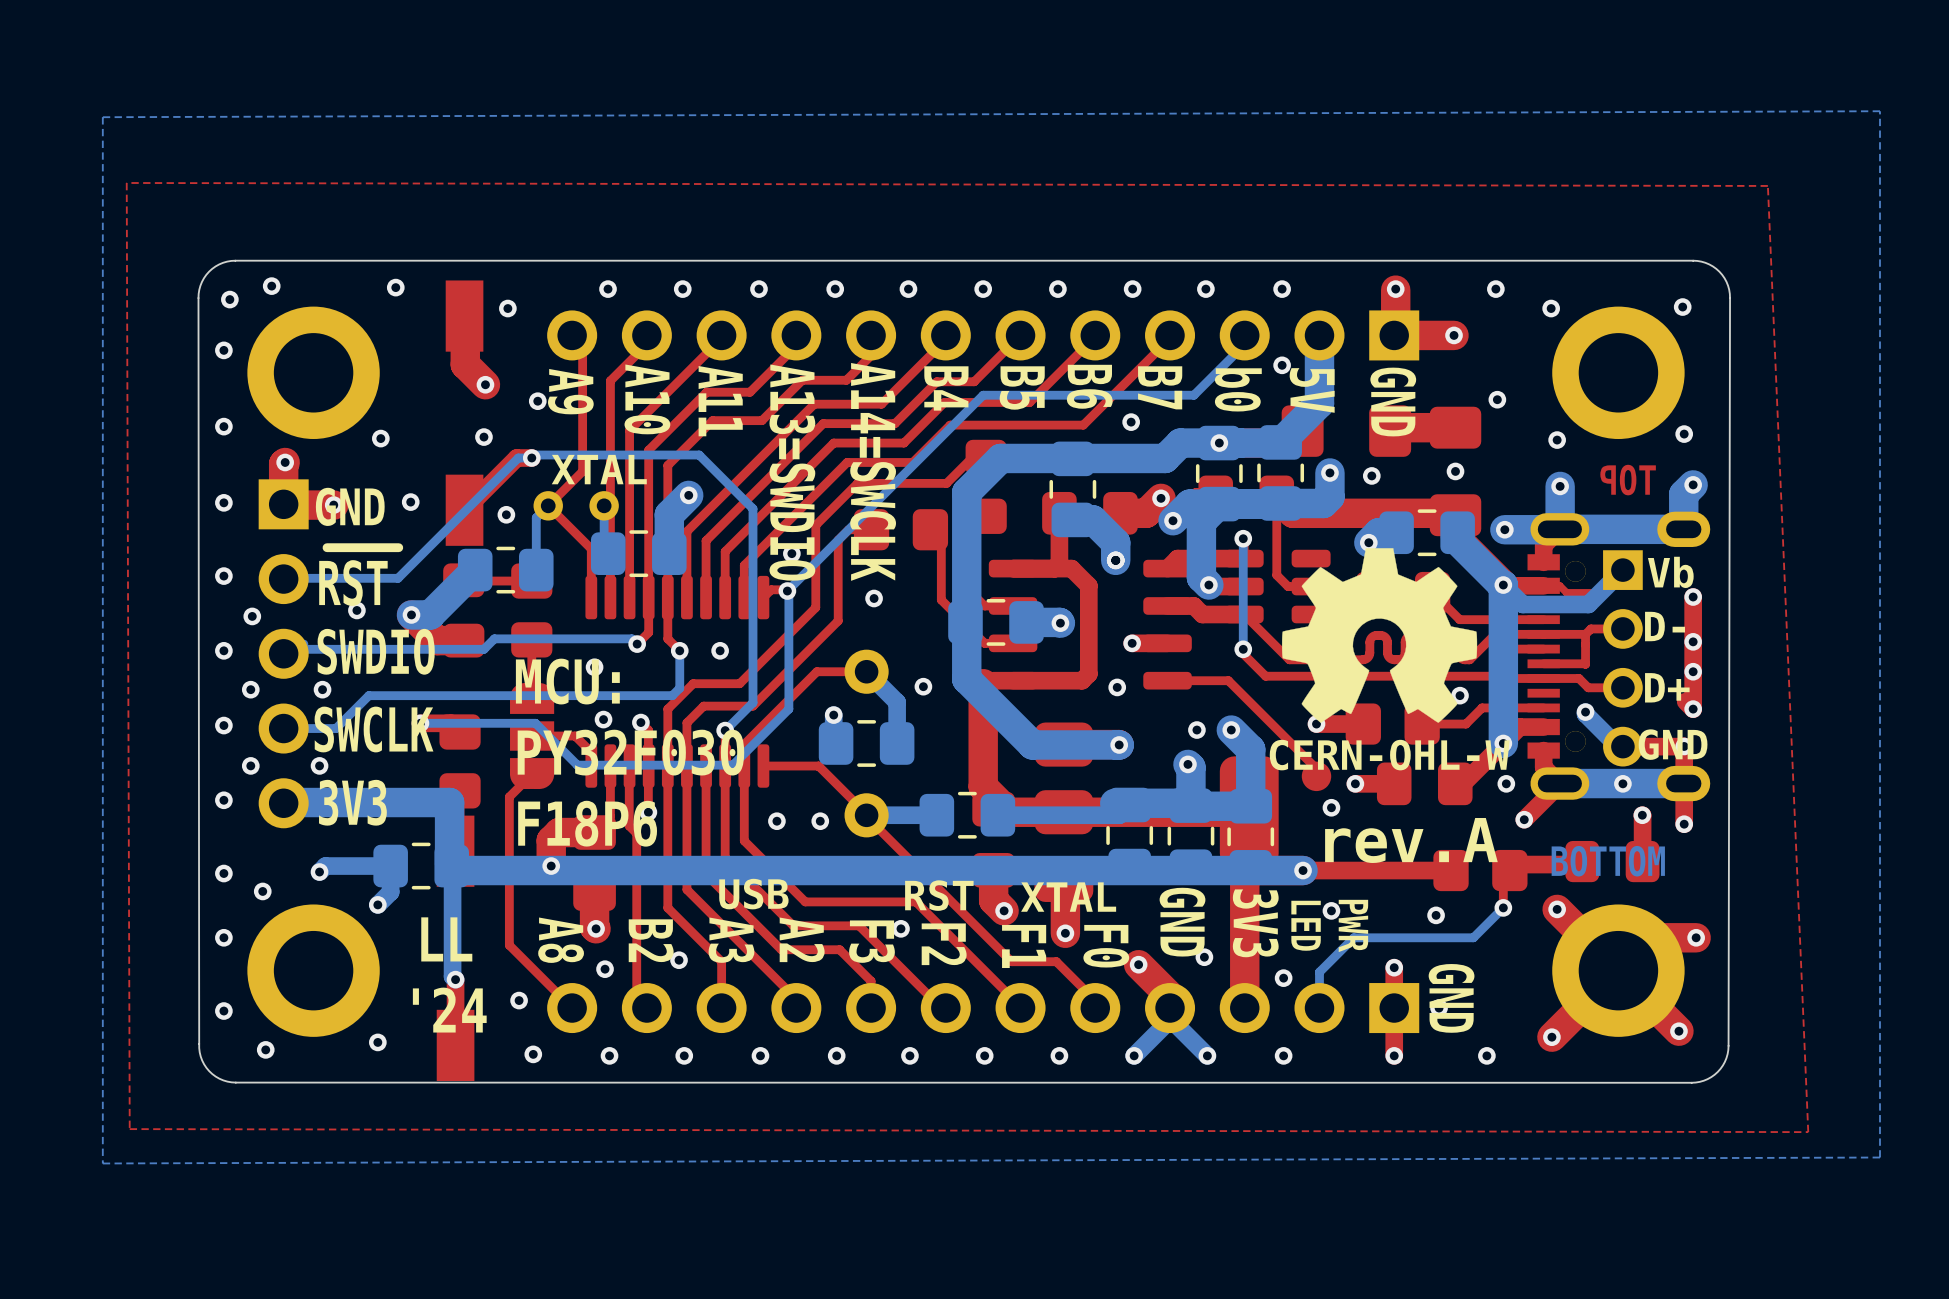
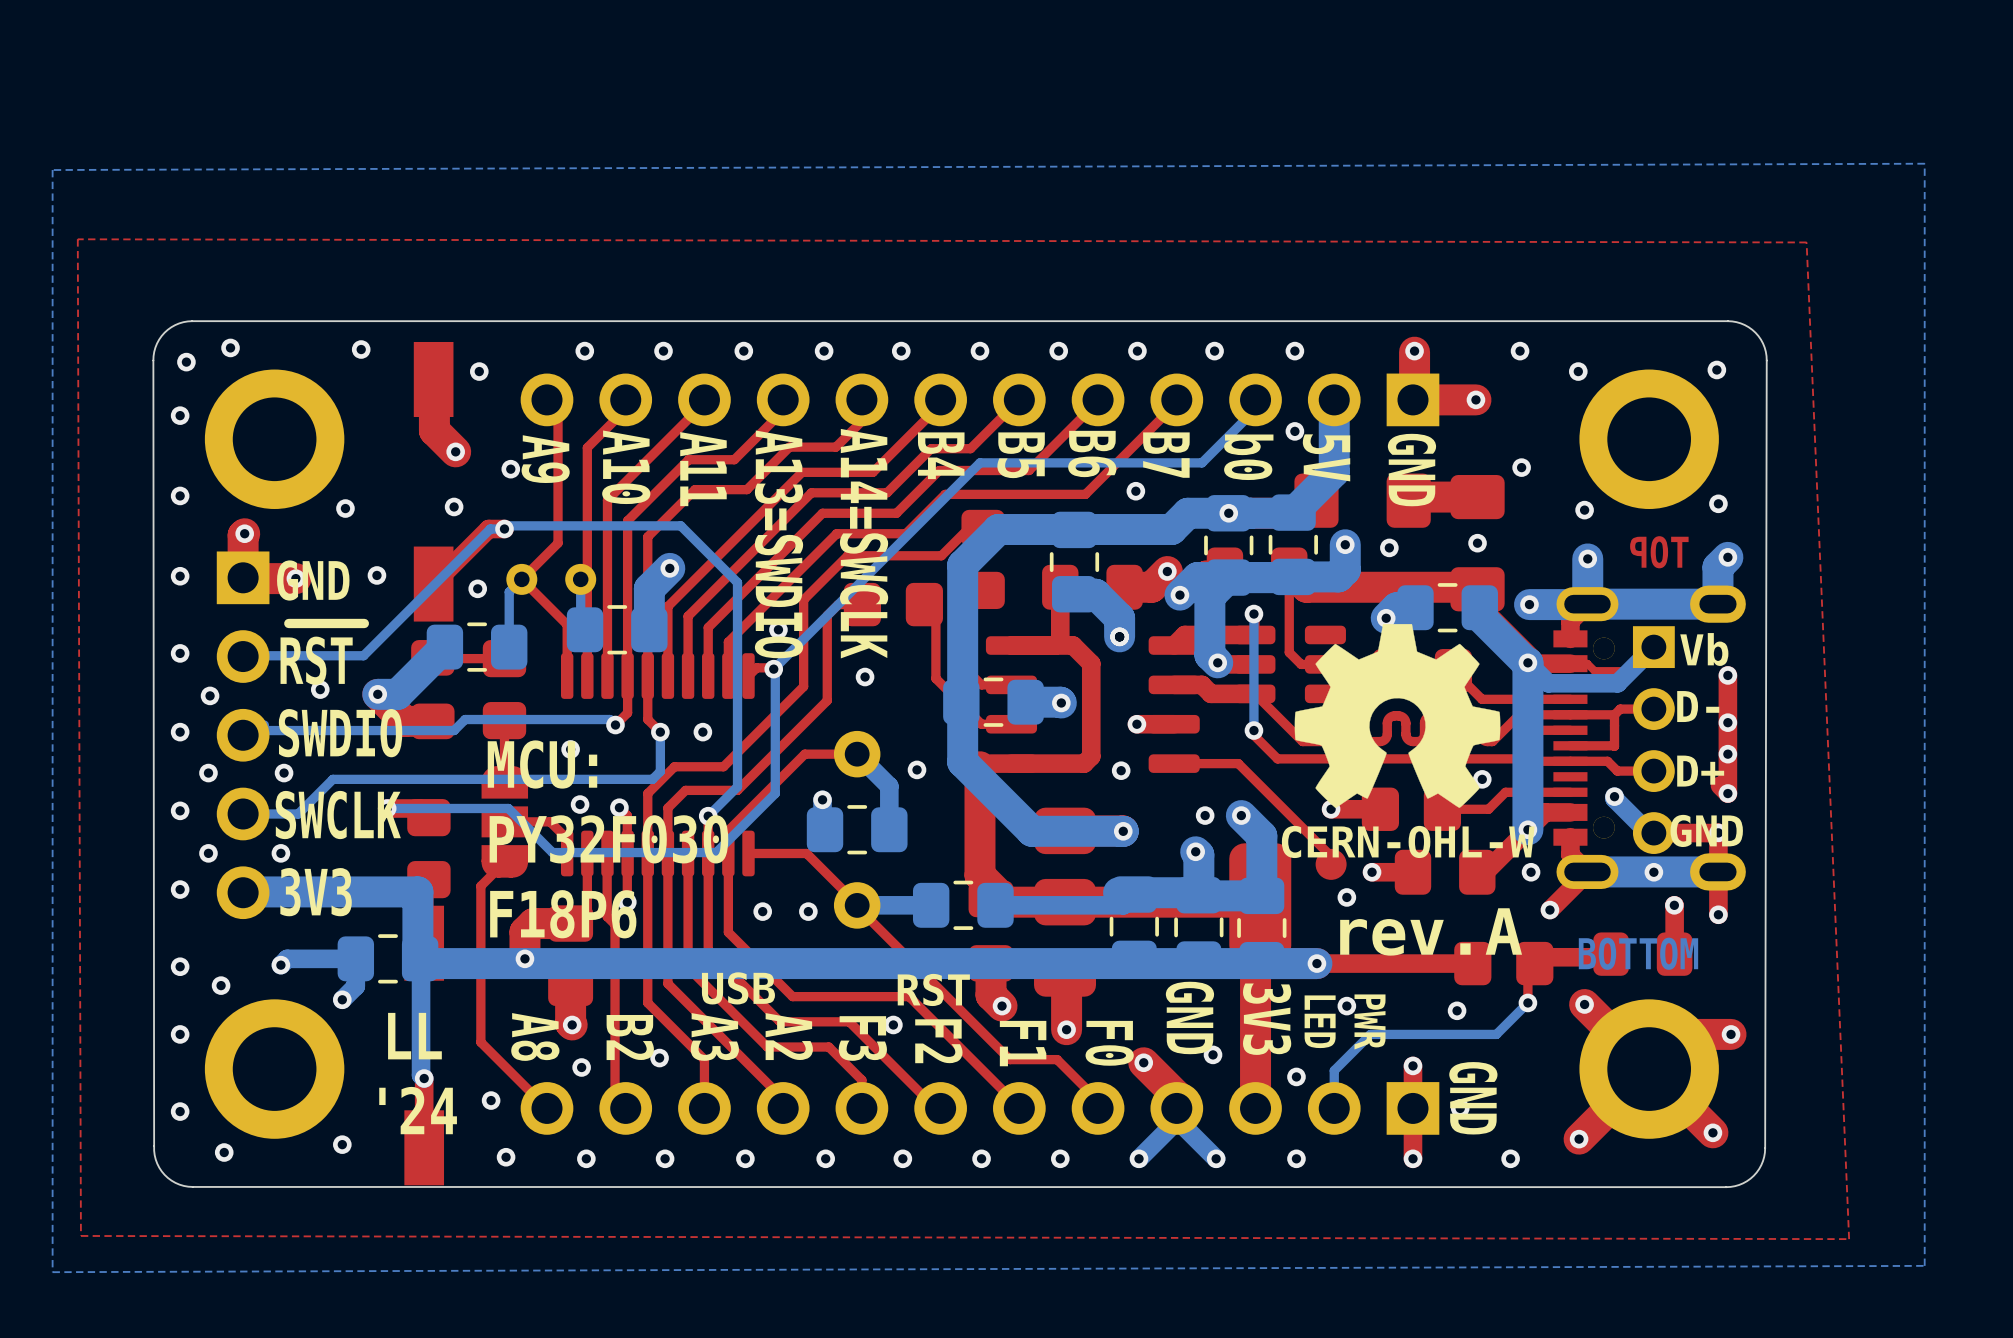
text: XTAL (599, 469) -> none
text: XTAL (1068, 897) -> none

